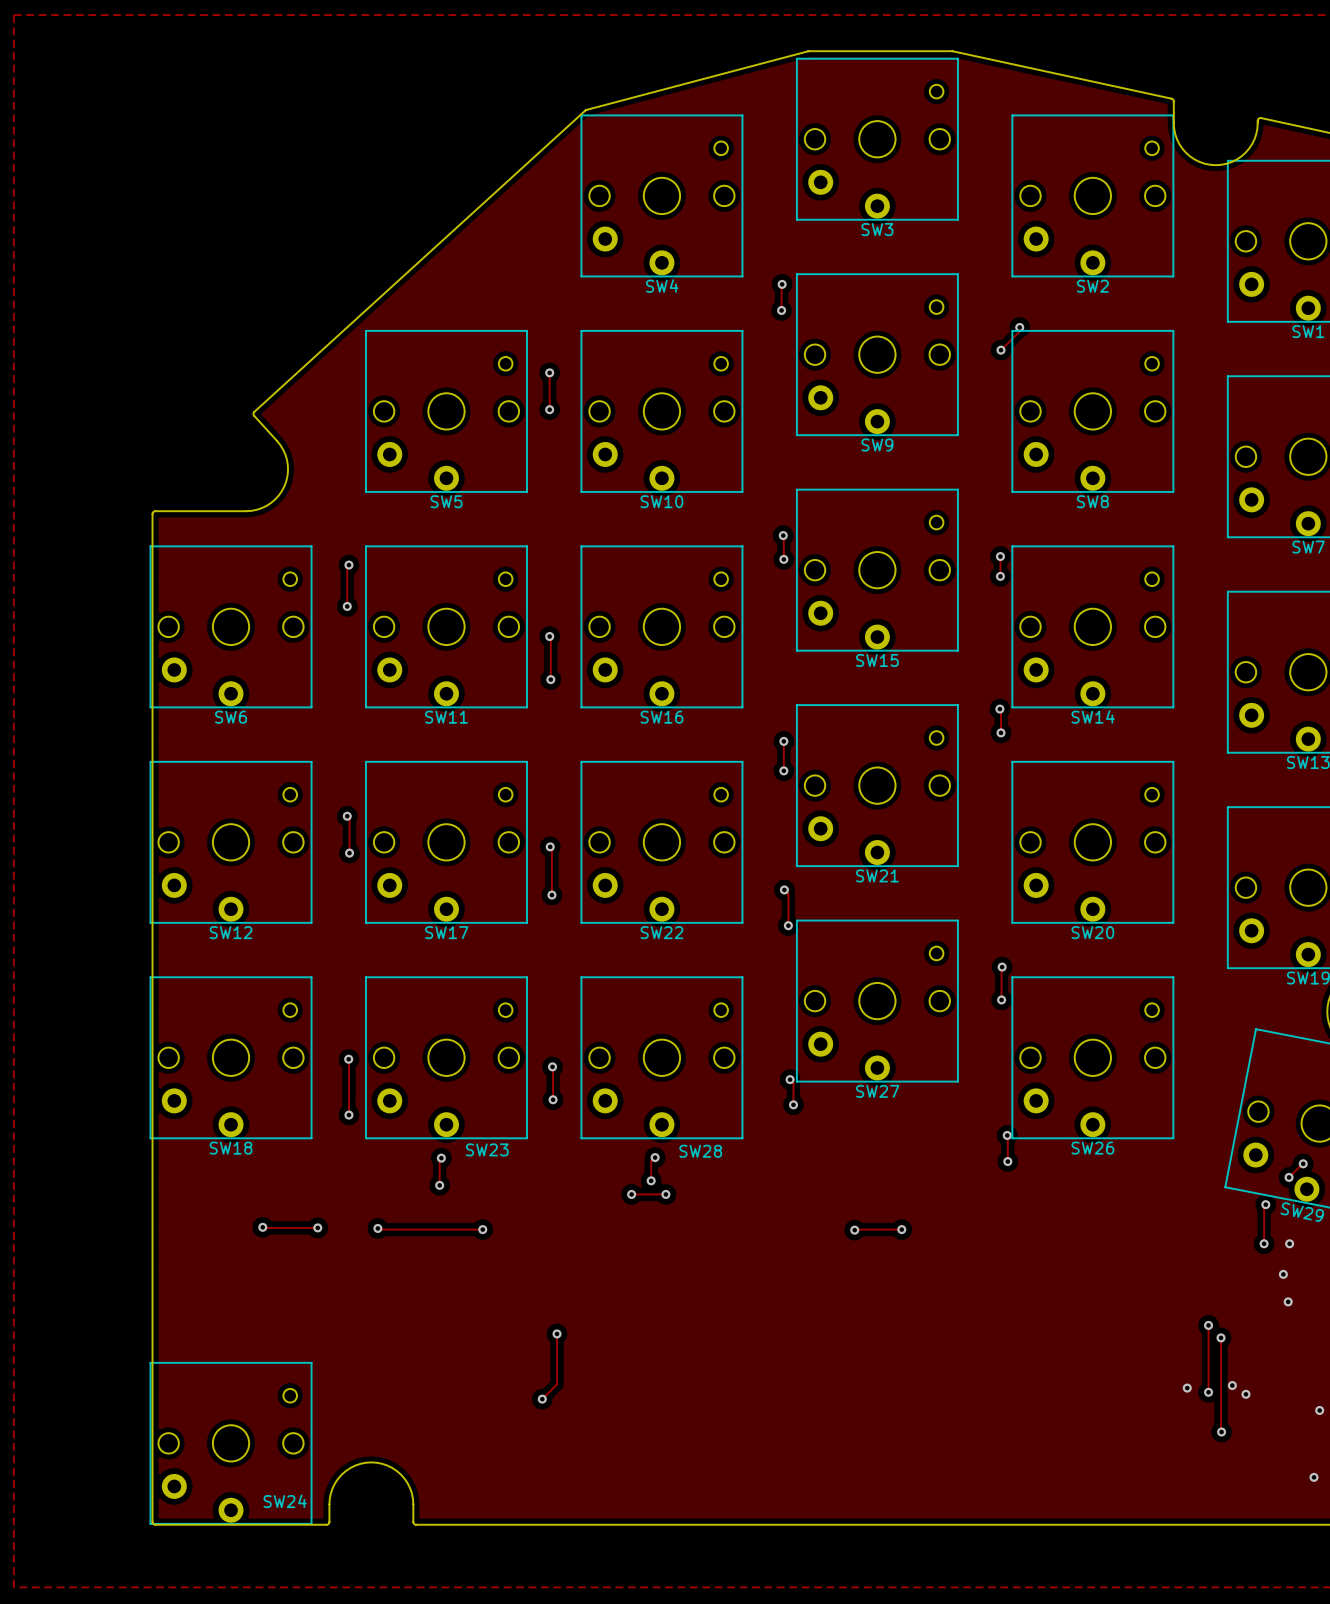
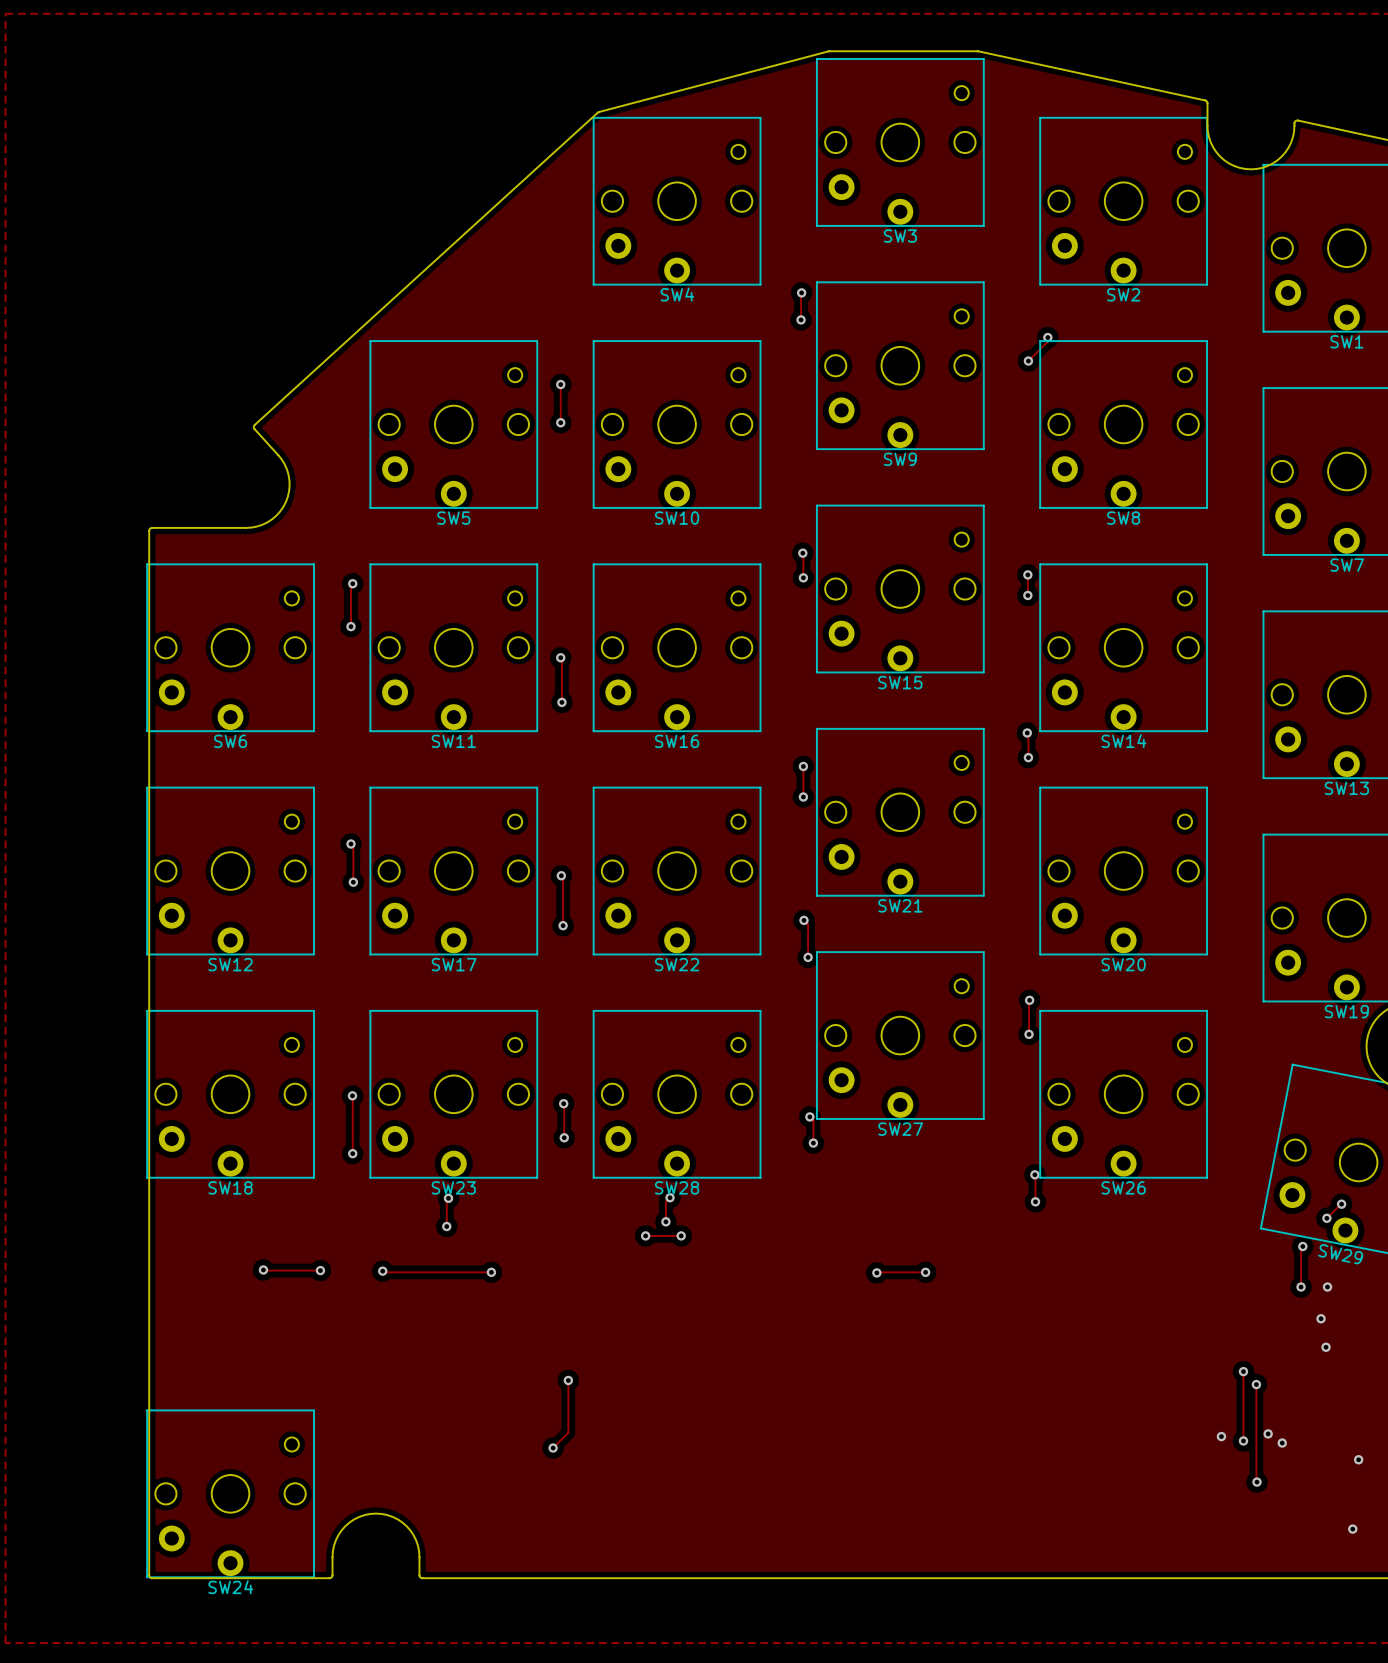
SW23 name position: SW23 (487, 1149) -> SW23 (453, 1187)
SW28 name position: SW28 (700, 1151) -> SW28 (677, 1187)
SW24 name position: SW24 (285, 1501) -> SW24 (230, 1587)

